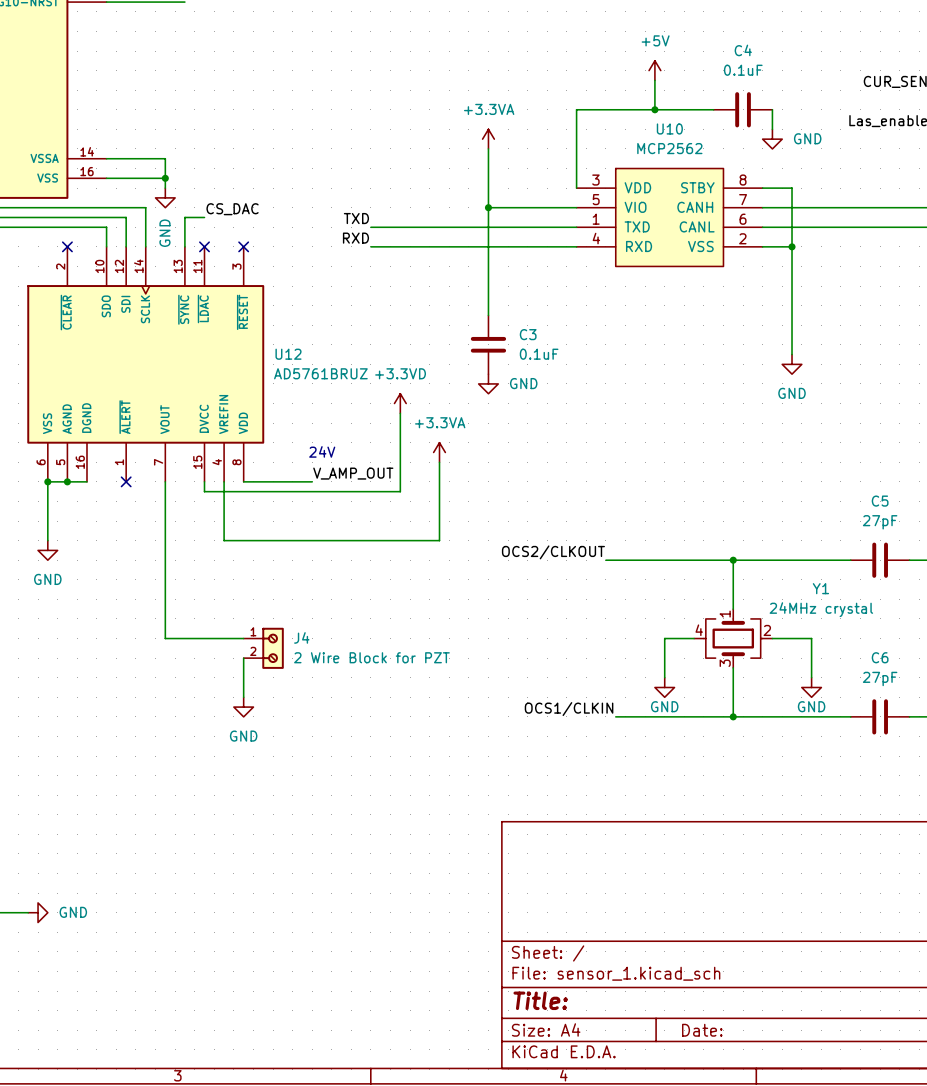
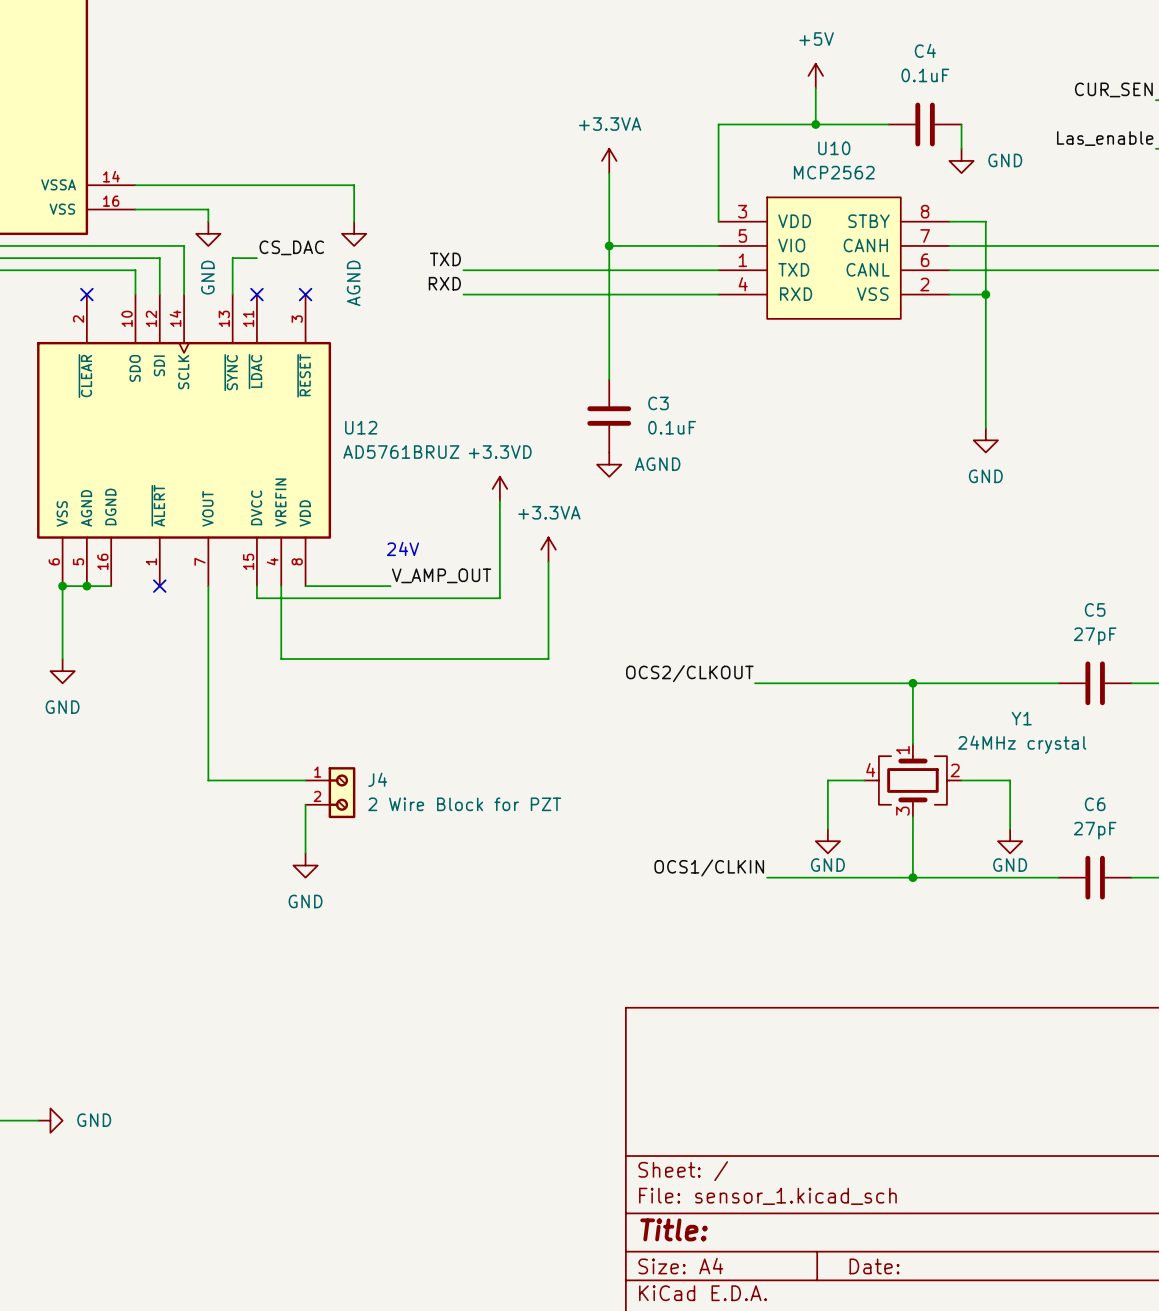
wire: (165, 158) (165, 178) -> (208, 185) (354, 185) (354, 221)
junction: (165, 178) -> none
power symbol: none -> AGND (354, 233)
power symbol: GND (488, 383) -> AGND (609, 464)

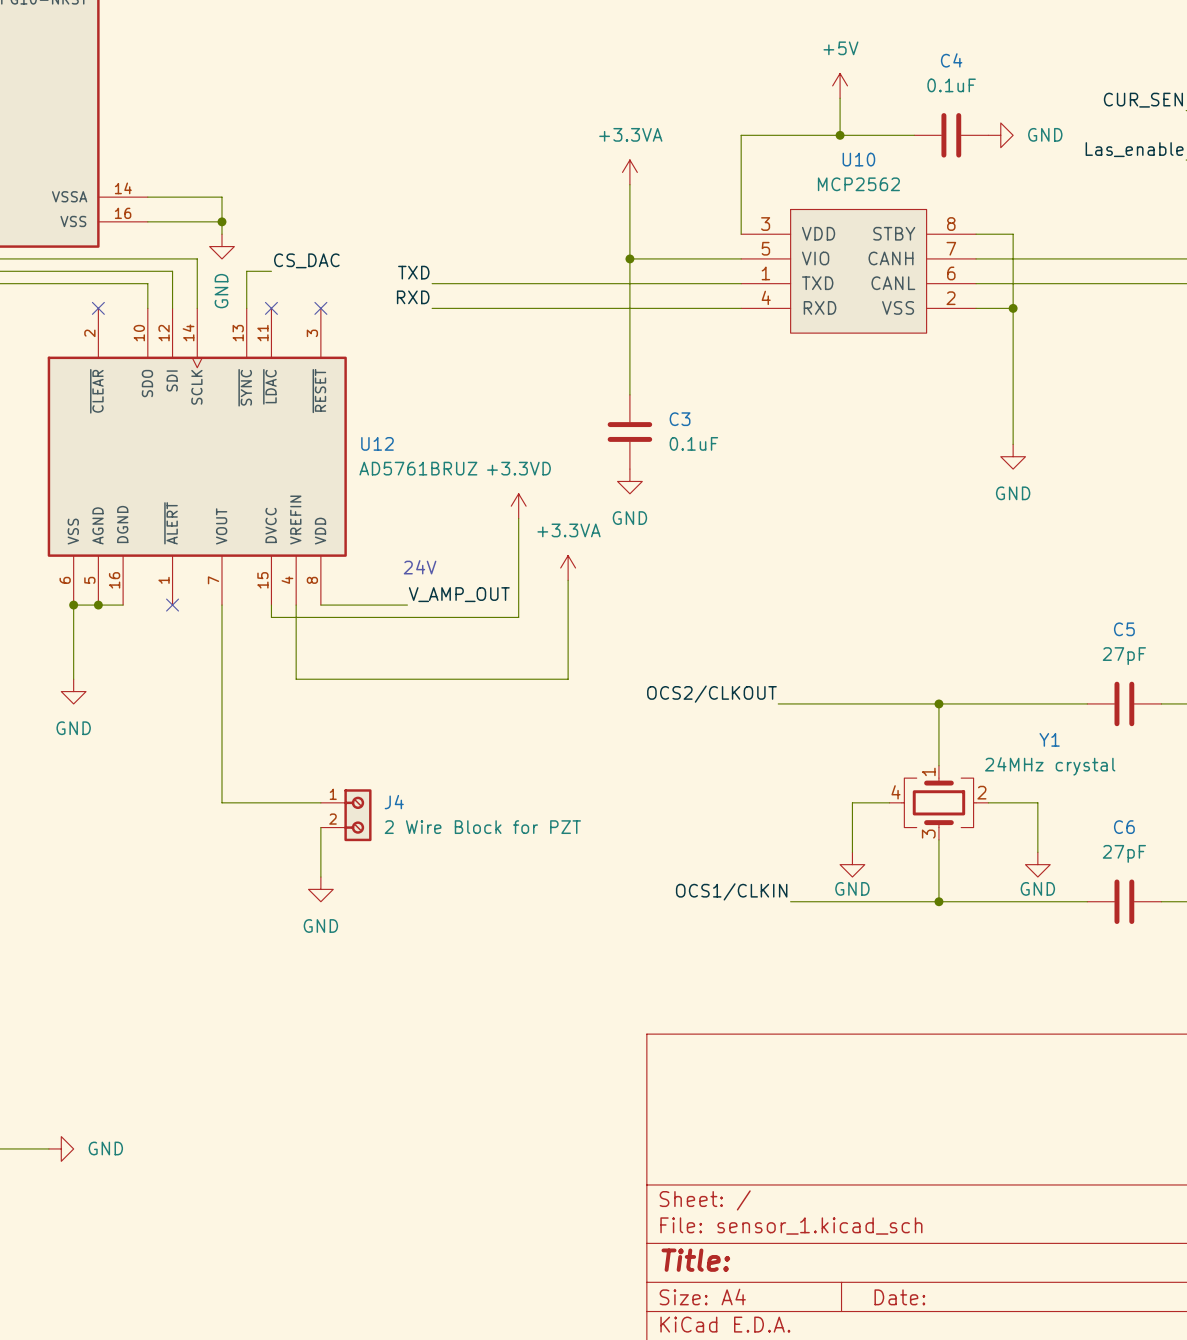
wire: (961, 124) (961, 148) -> none
power symbol rotation: 0° (961, 160) -> 90° counterclockwise (1000, 135)
power symbol position: GND (961, 160) -> GND (1000, 135)
wire: (208, 185) (354, 185) (354, 221) -> (221, 197) (221, 221)
junction: none -> (221, 221)
power symbol: AGND (354, 233) -> none
label position: TXD (445, 259) -> TXD (413, 272)
wire: none -> (432, 283) (481, 283)
label position: RXD (444, 283) -> RXD (413, 297)
wire: none -> (432, 308) (481, 308)
power symbol: AGND (609, 464) -> GND (629, 481)

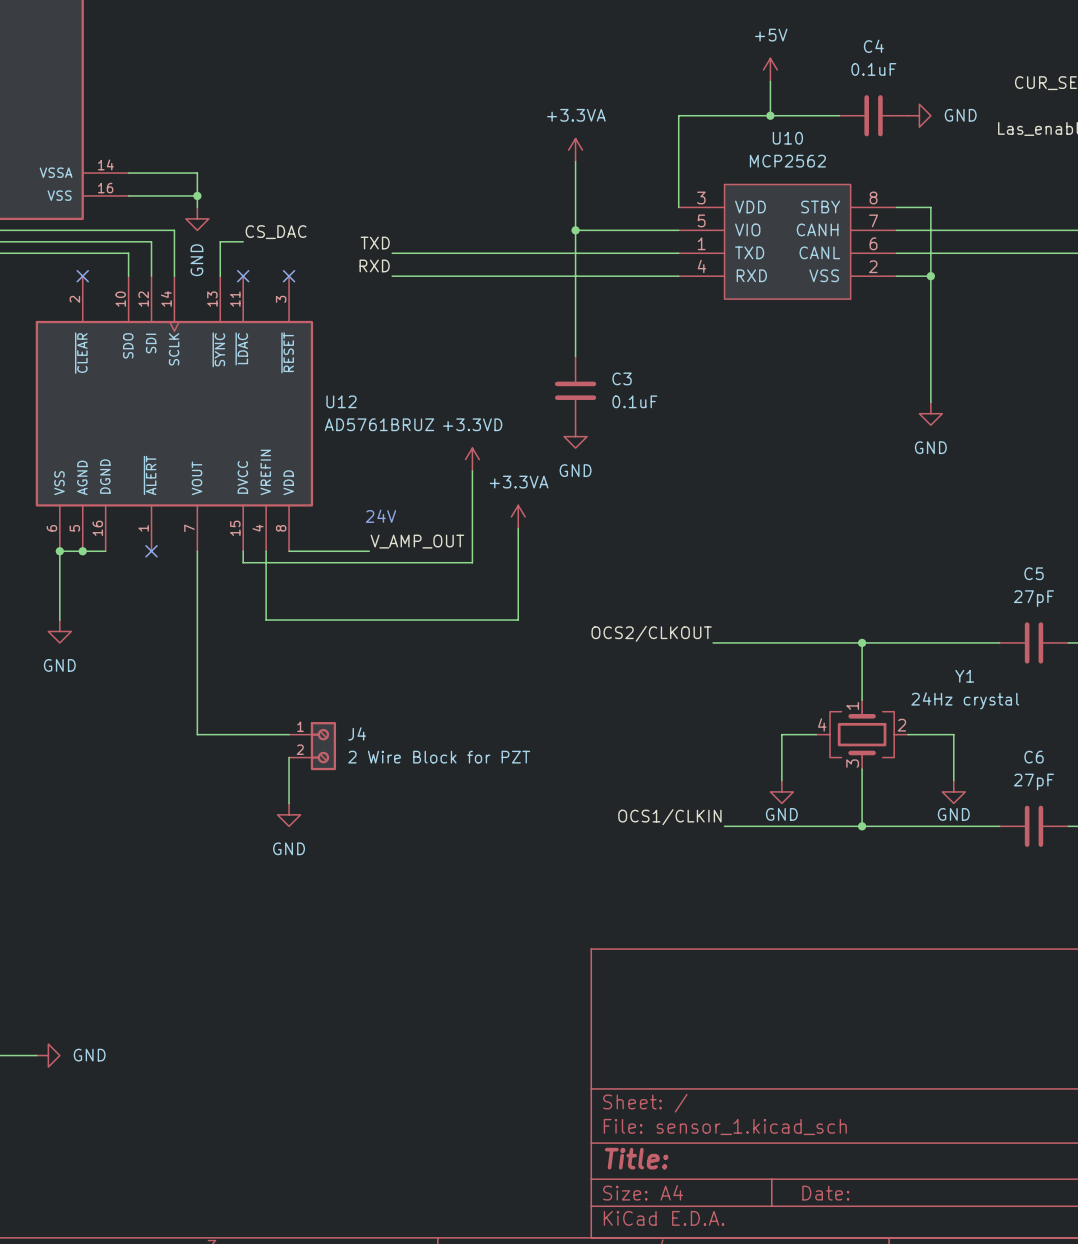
Y1 value: 24MHz crystal (1050, 766) -> 24Hz crystal (965, 700)

